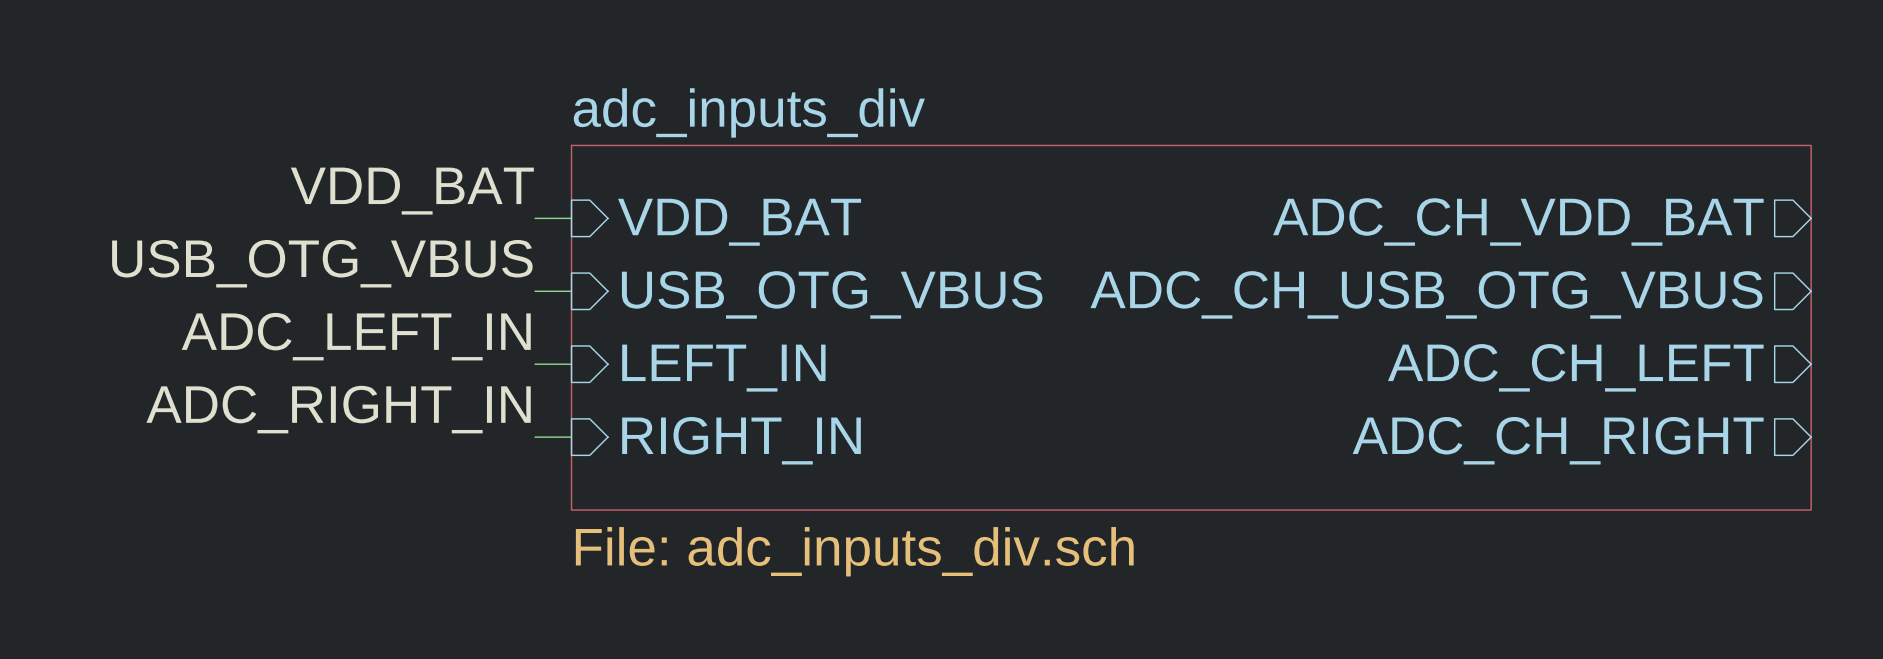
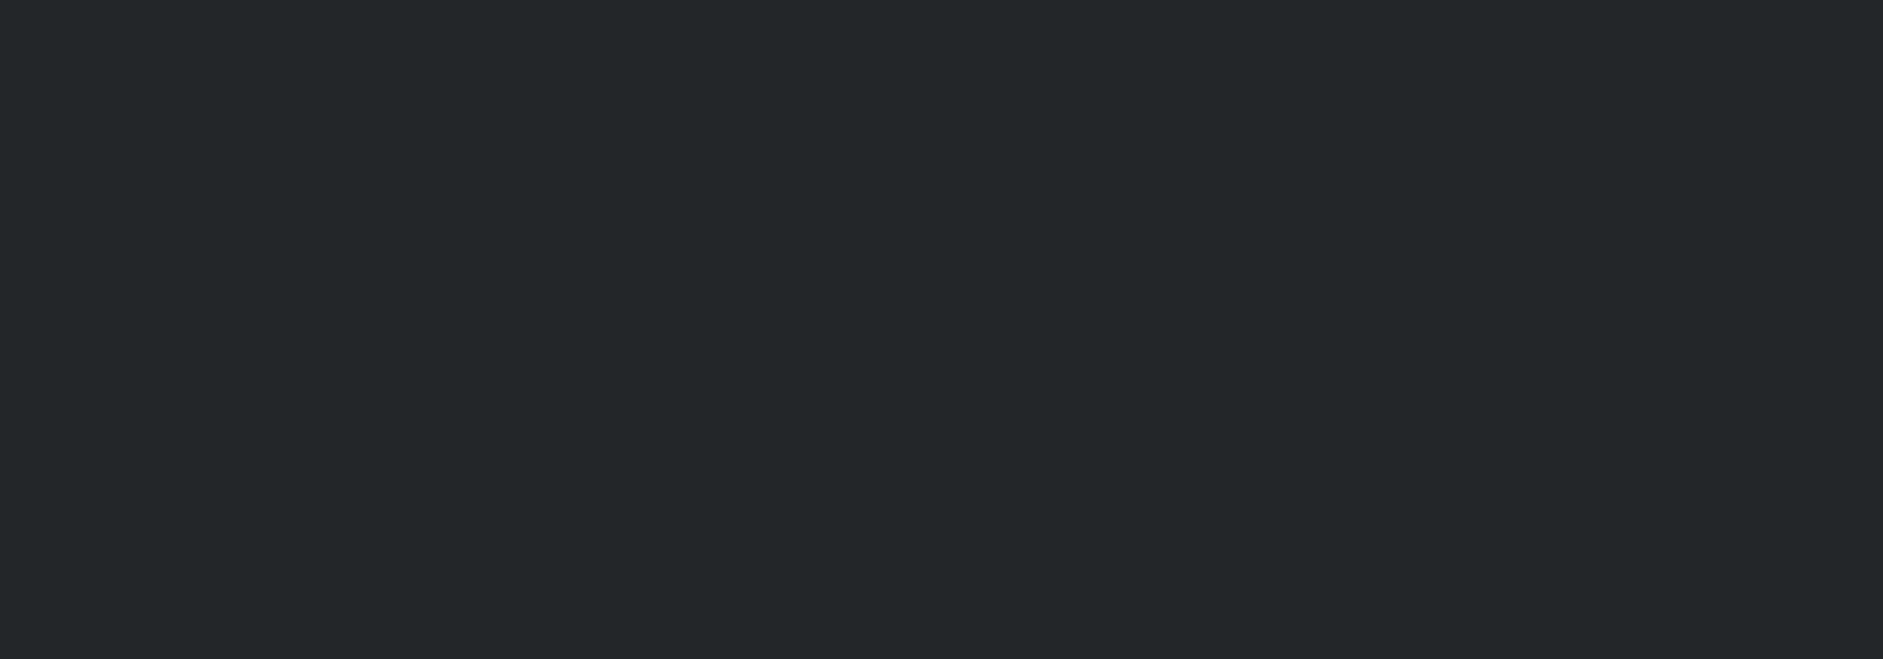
label: VDD_BAT (412, 191) -> none
wire: (535, 218) (571, 218) -> none
sheet pin: ADC_CH_VDD_BAT (1518, 221) -> none
sheet pin: VDD_BAT (739, 222) -> none
label: USB_OTG_VBUS (322, 263) -> none
wire: (535, 291) (571, 291) -> none
sheet pin: USB_OTG_VBUS (832, 294) -> none
sheet pin: ADC_CH_USB_OTG_VBUS (1426, 294) -> none
sheet adc_inputs_div: File: adc_inputs_div.sch (1191, 327) -> none
label: ADC_LEFT_IN (356, 336) -> none
wire: (535, 364) (571, 364) -> none
sheet pin: ADC_CH_LEFT (1575, 367) -> none
sheet pin: LEFT_IN (723, 368) -> none
label: ADC_RIGHT_IN (338, 409) -> none
wire: (535, 437) (571, 437) -> none
sheet pin: RIGHT_IN (741, 440) -> none
sheet pin: ADC_CH_RIGHT (1558, 440) -> none

